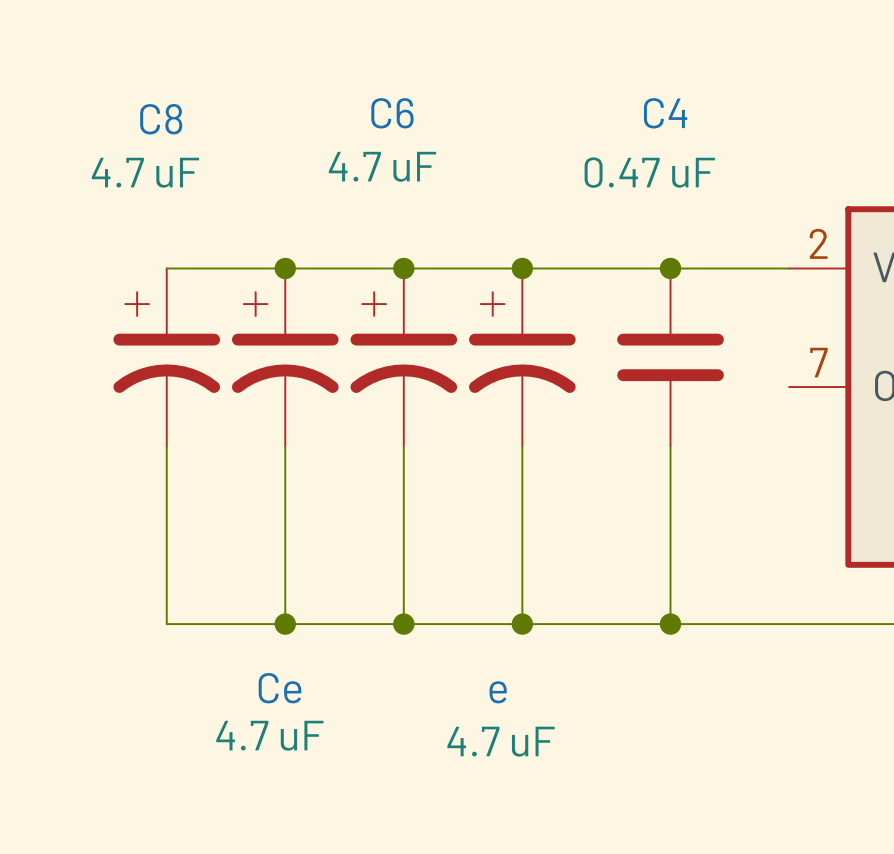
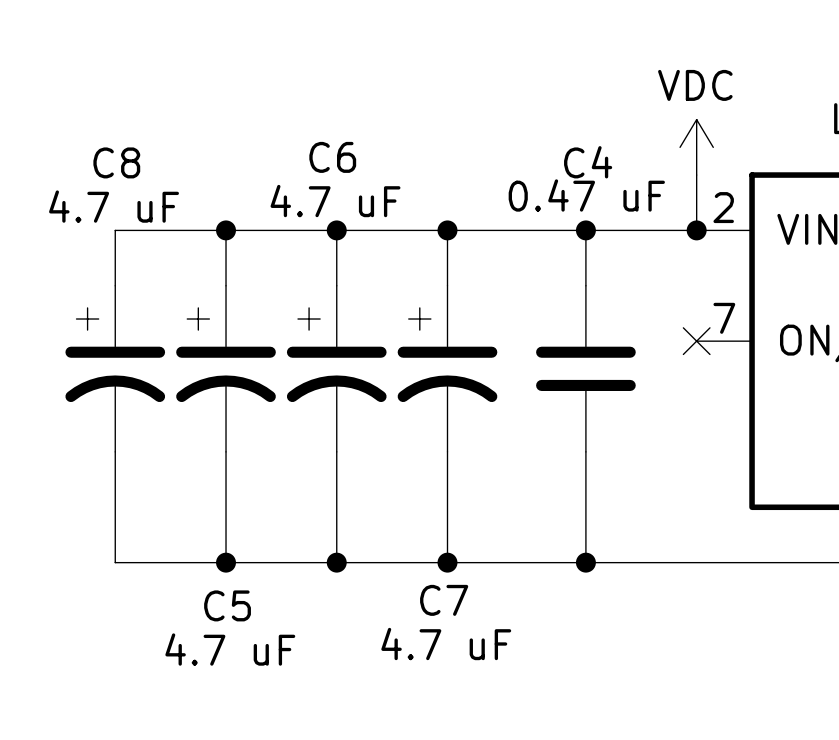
C6 name position: C6 (392, 113) -> C6 (332, 157)
C4 name position: C4 (665, 113) -> C4 (588, 162)
C8 name position: C8 (161, 119) -> C8 (116, 162)
C6 value position: 4.7 uF (382, 166) -> 4.7 uF (335, 201)
C8 value position: 4.7 uF (145, 172) -> 4.7 uF (114, 206)
power symbol: none -> VDC (696, 147)
wire: none -> (696, 175) (696, 230)
junction: none -> (696, 230)
C8 position: (166, 357) -> (115, 368)
Ce: 4.7 uF (285, 357) -> none
C6 position: (403, 357) -> (336, 368)
e: 4.7 uF (522, 357) -> none
C4 position: (670, 357) -> (585, 368)
no-connect mark: none -> (696, 341)
C5: none -> 4.7 uF (226, 368)
C7: none -> 4.7 uF (447, 368)

